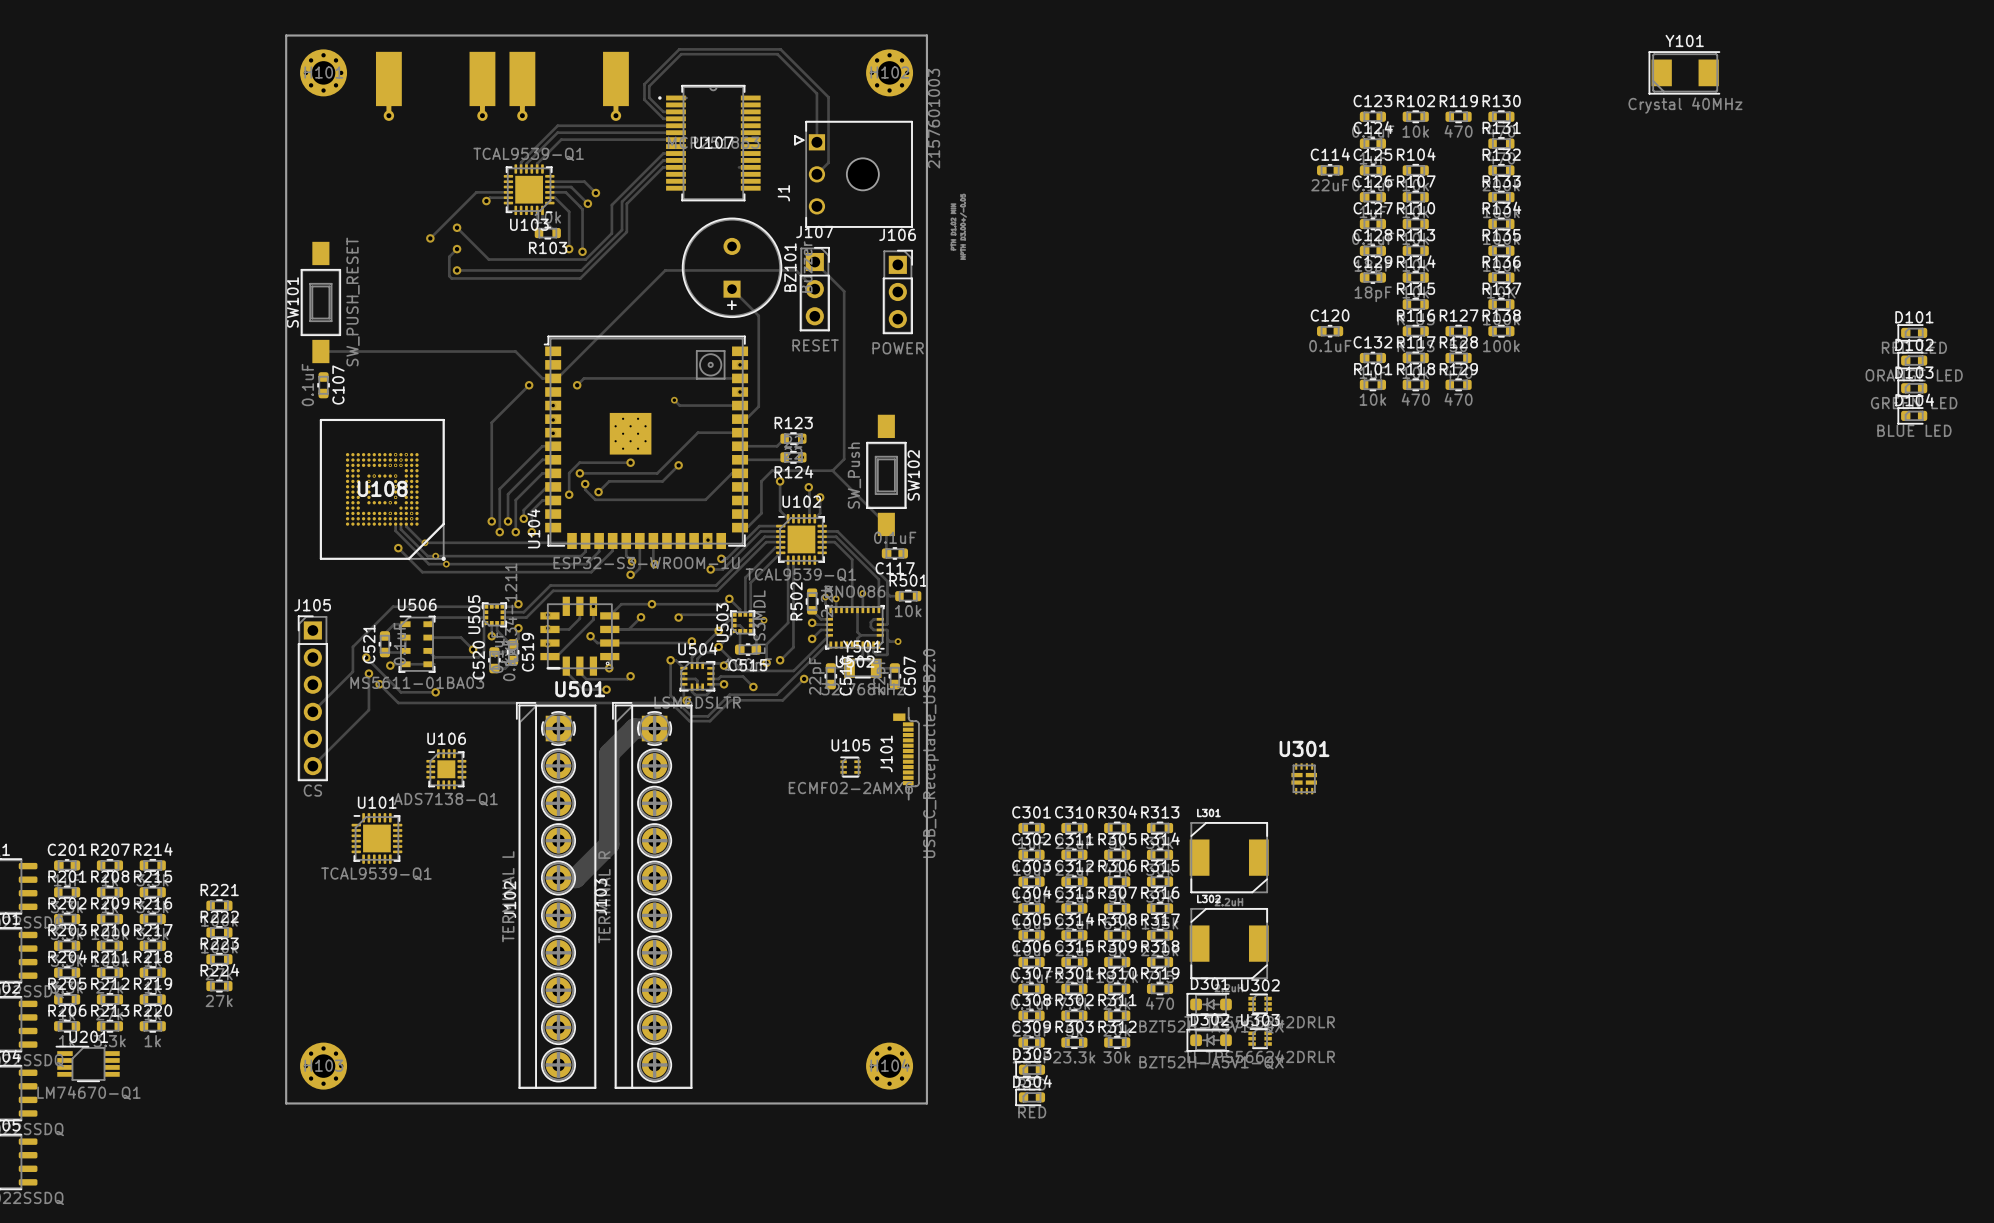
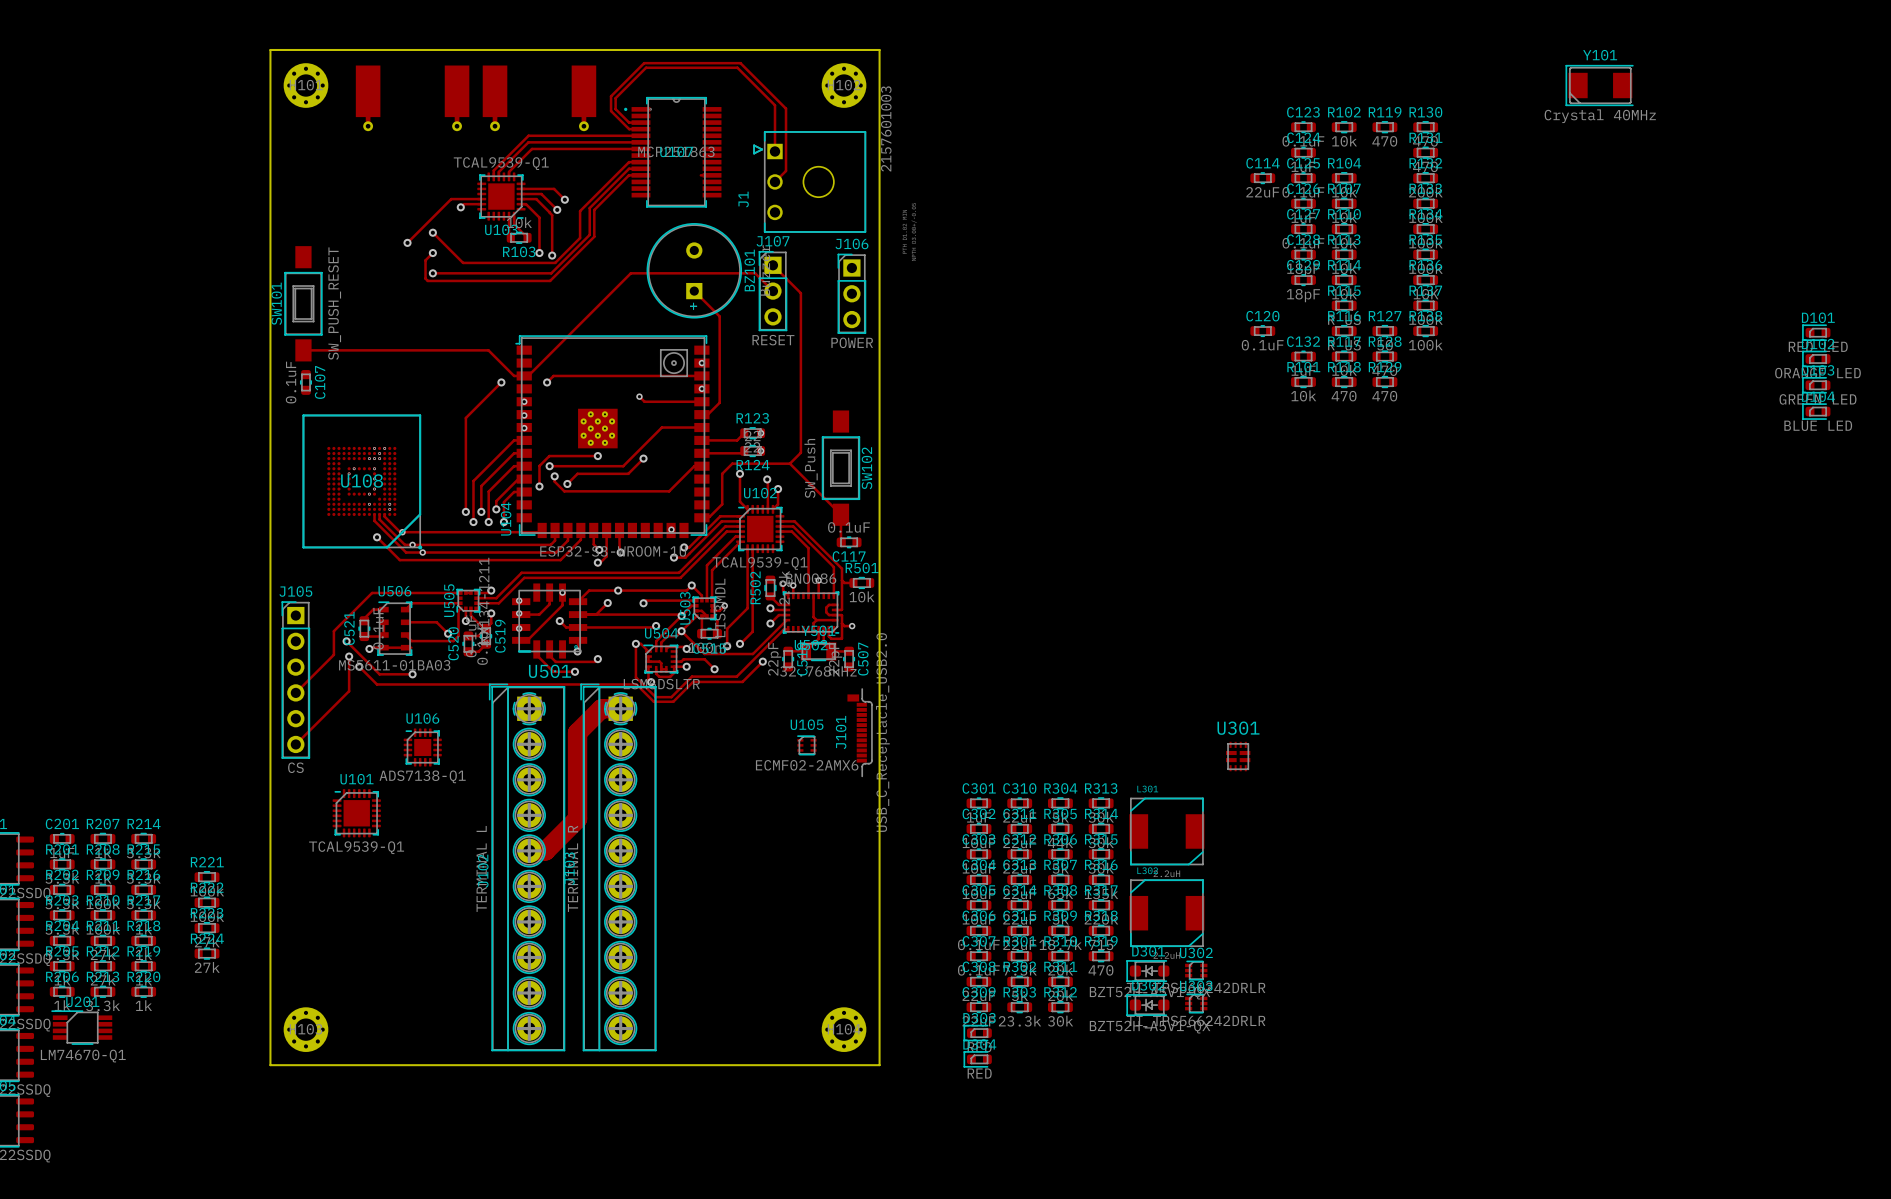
J107 footprint: [799, 247, 830, 332] -> [758, 251, 788, 331]
J106 footprint: [883, 250, 913, 334] -> [837, 253, 867, 334]

